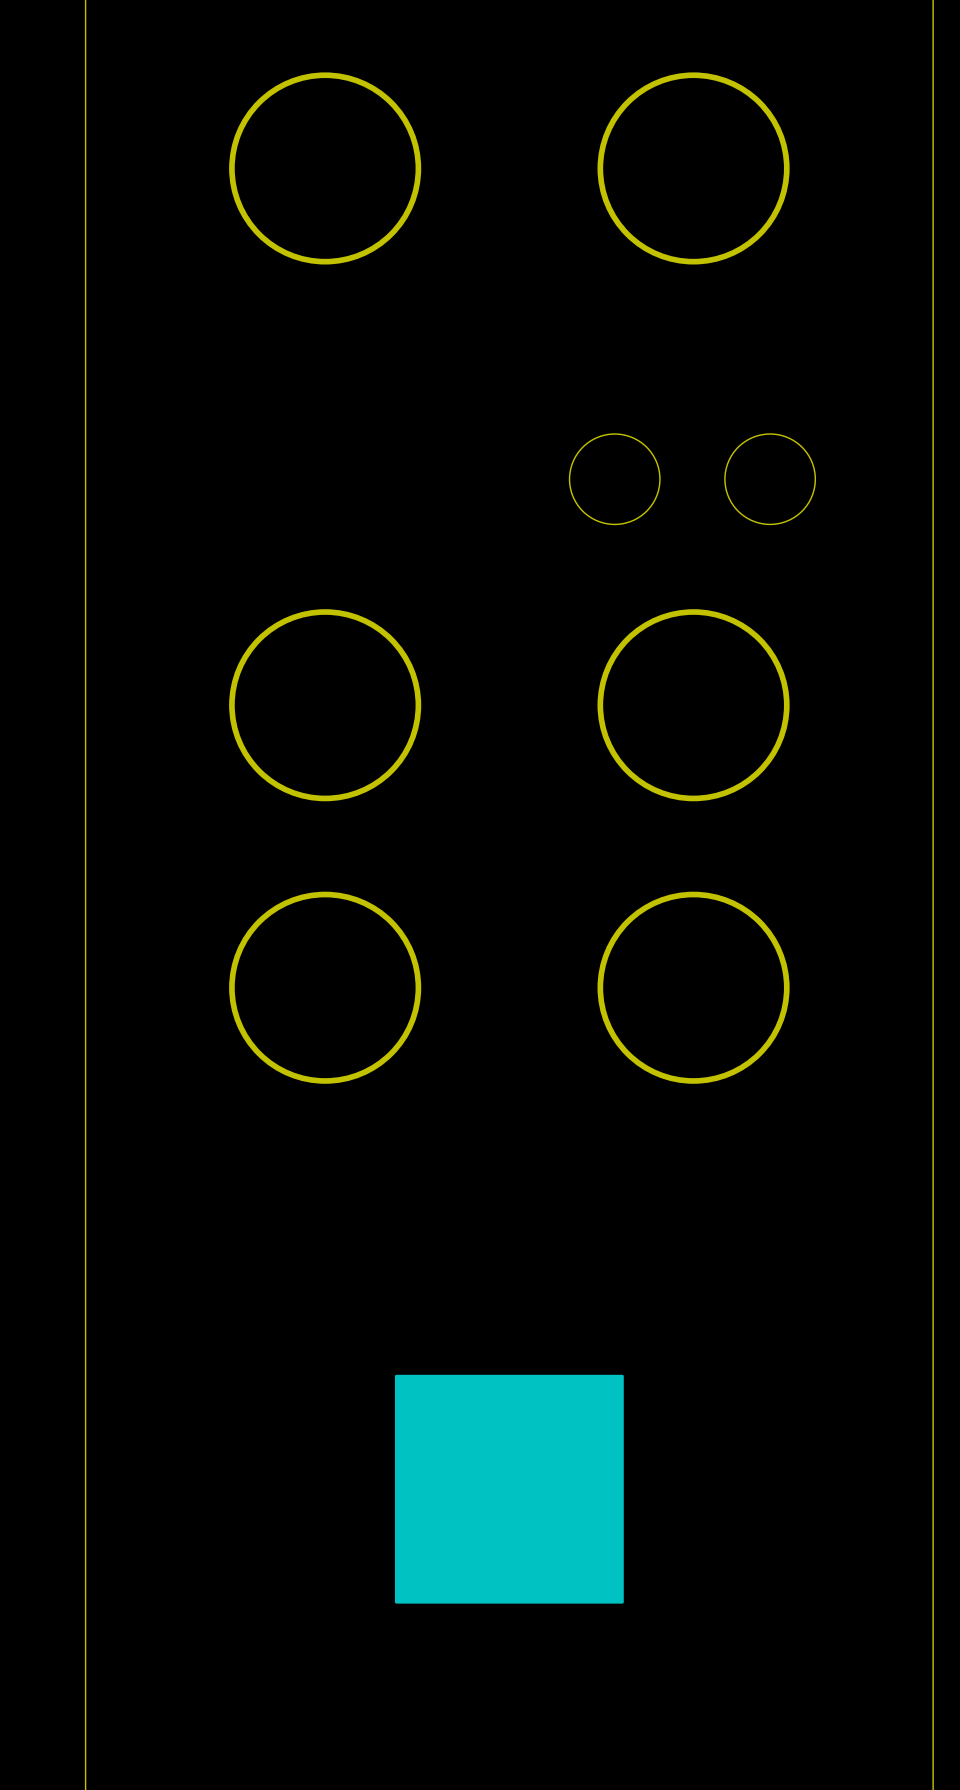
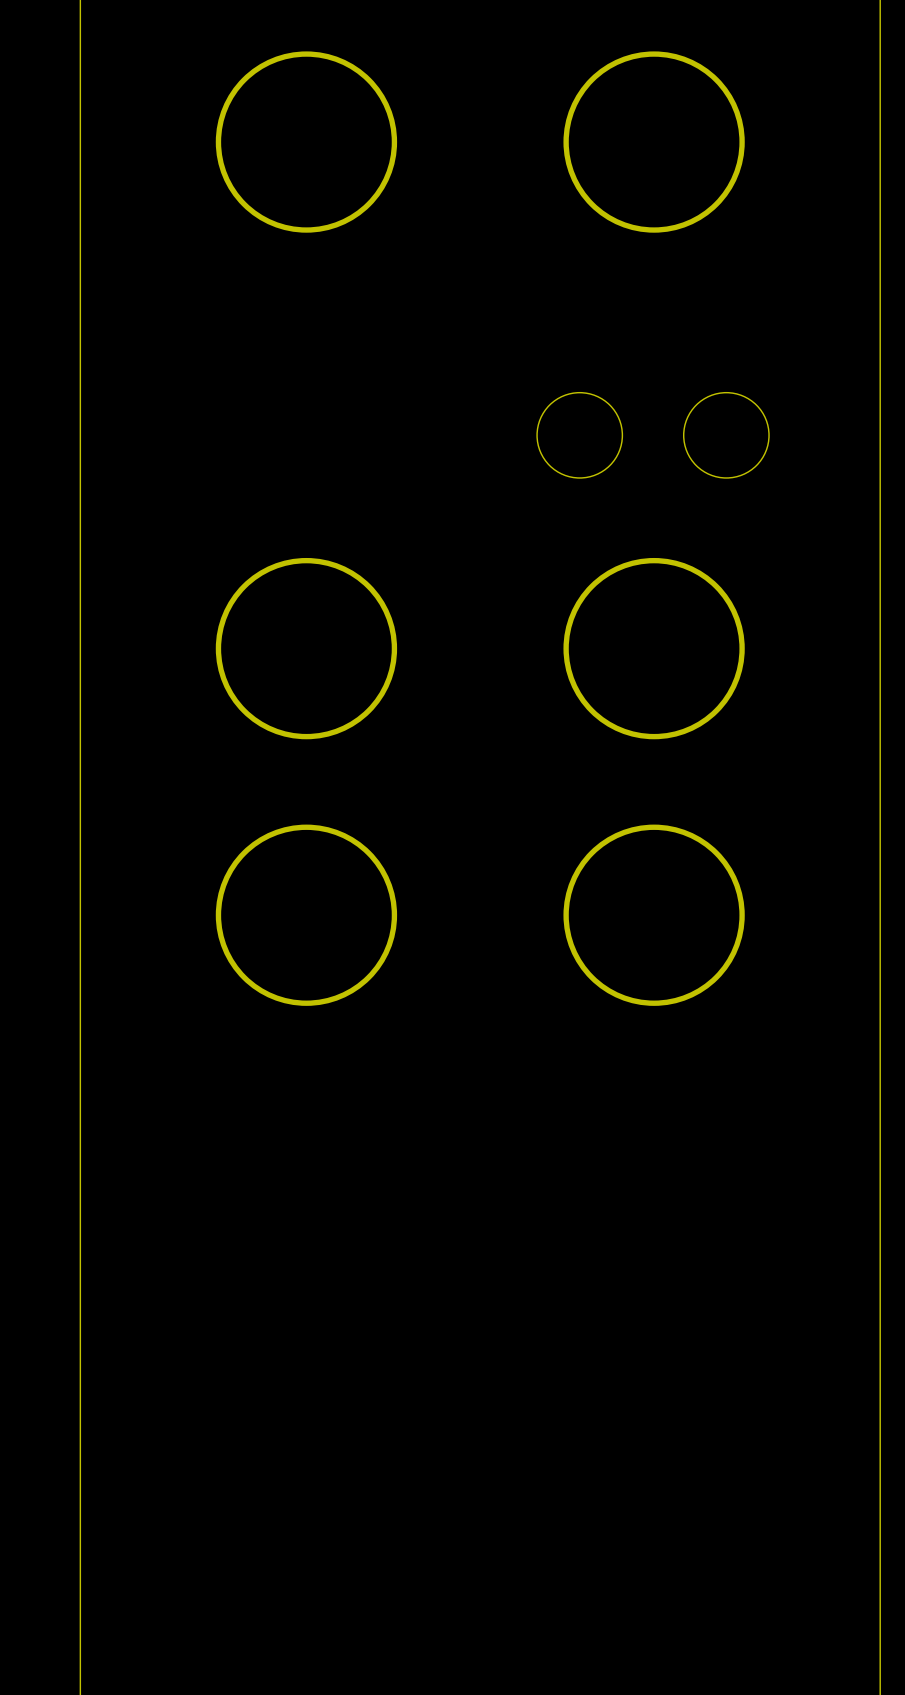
drawing: [394, 1374, 624, 1604] -> none

